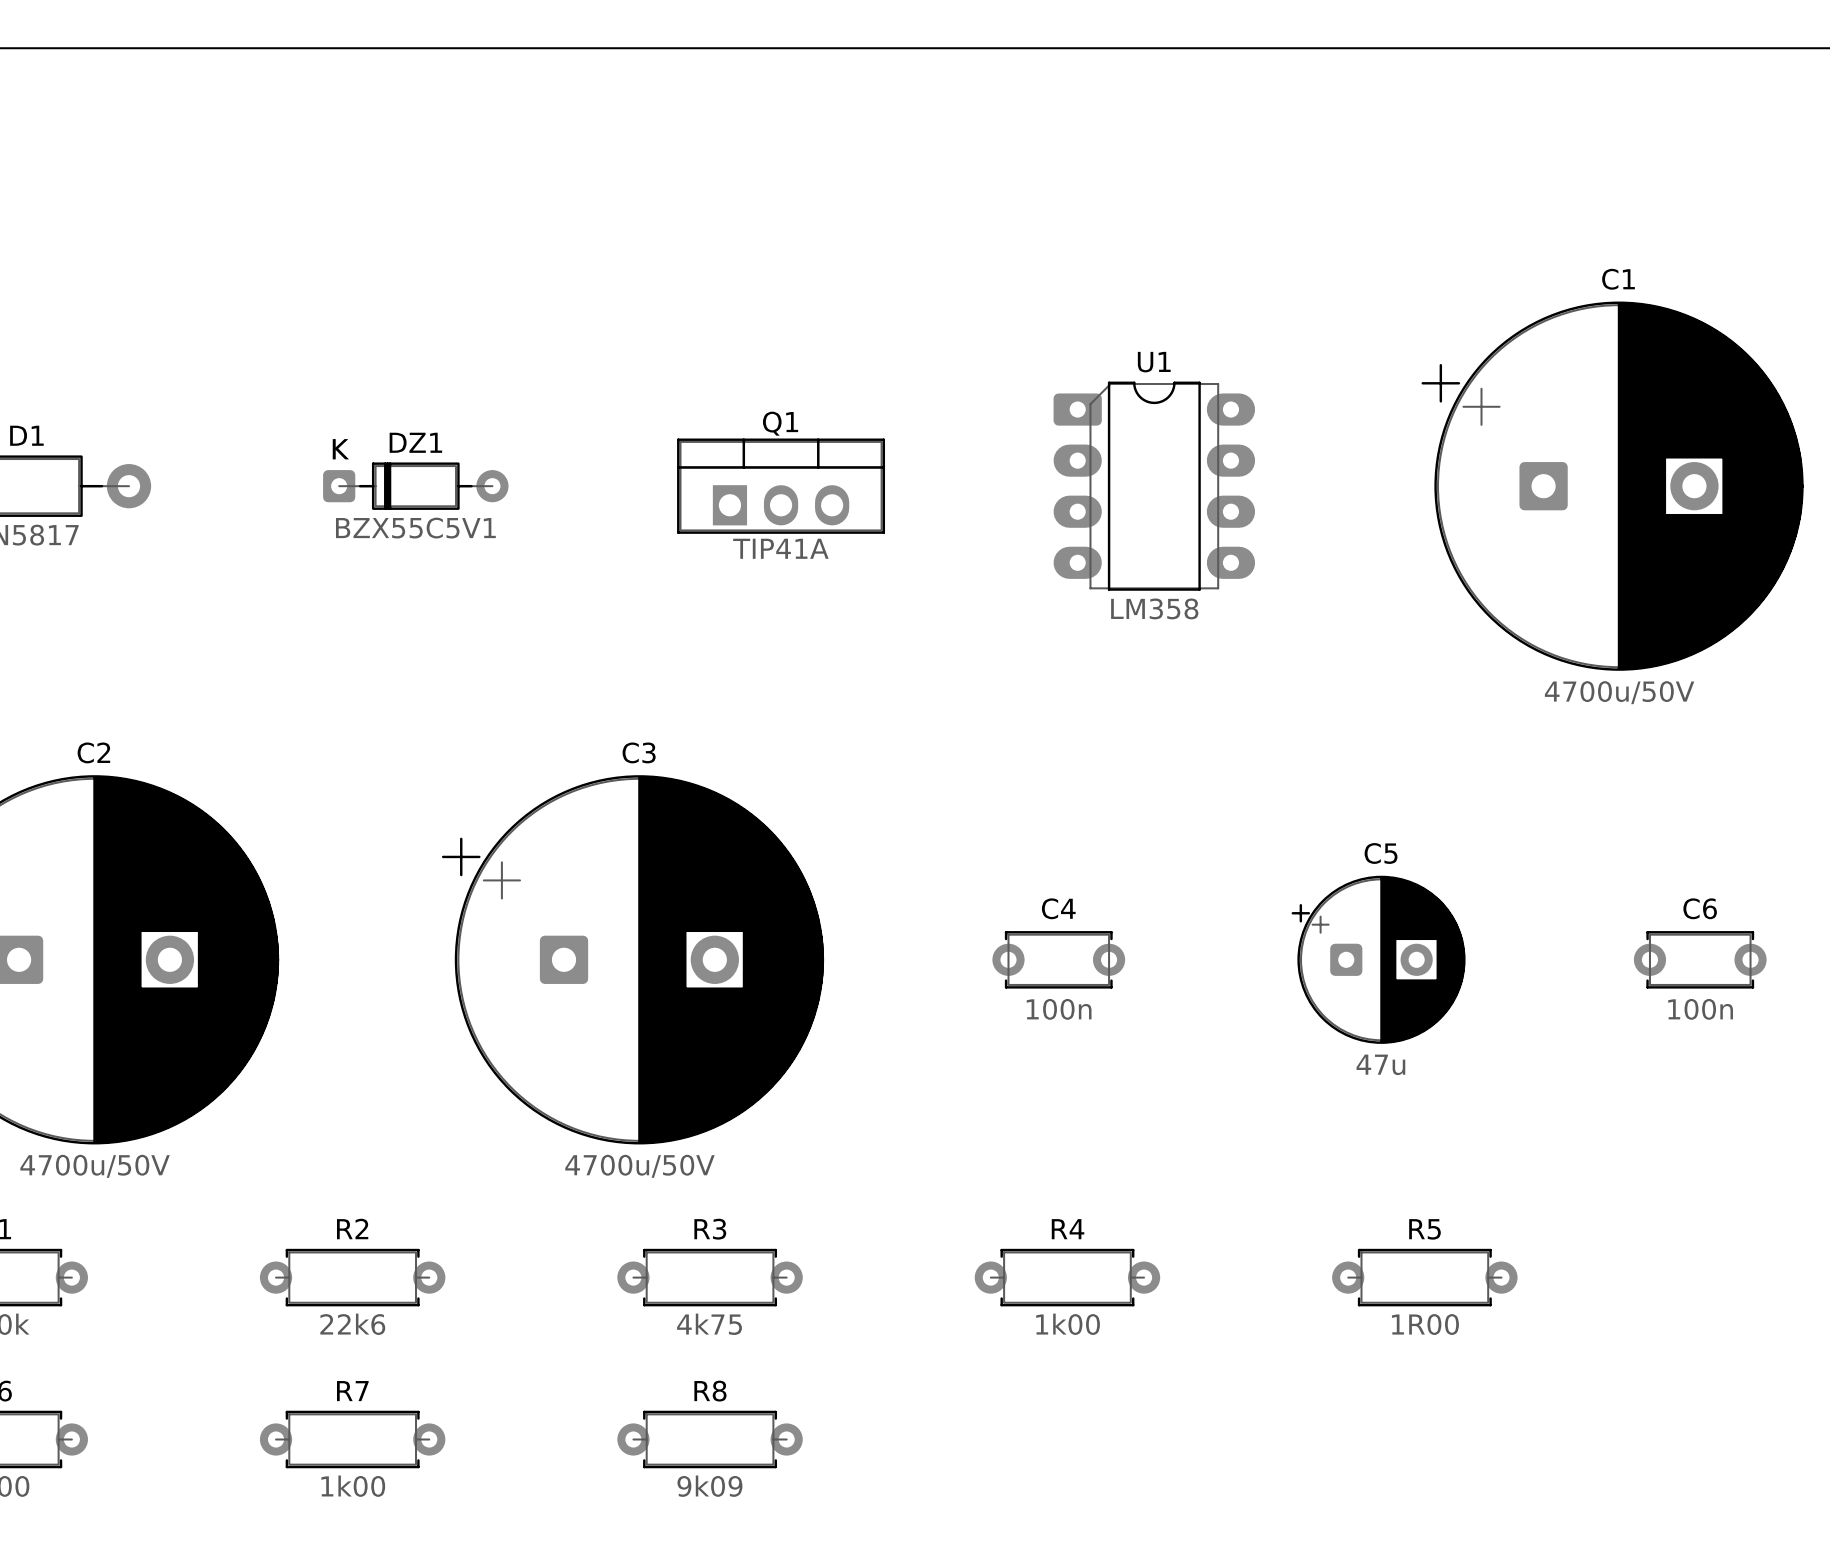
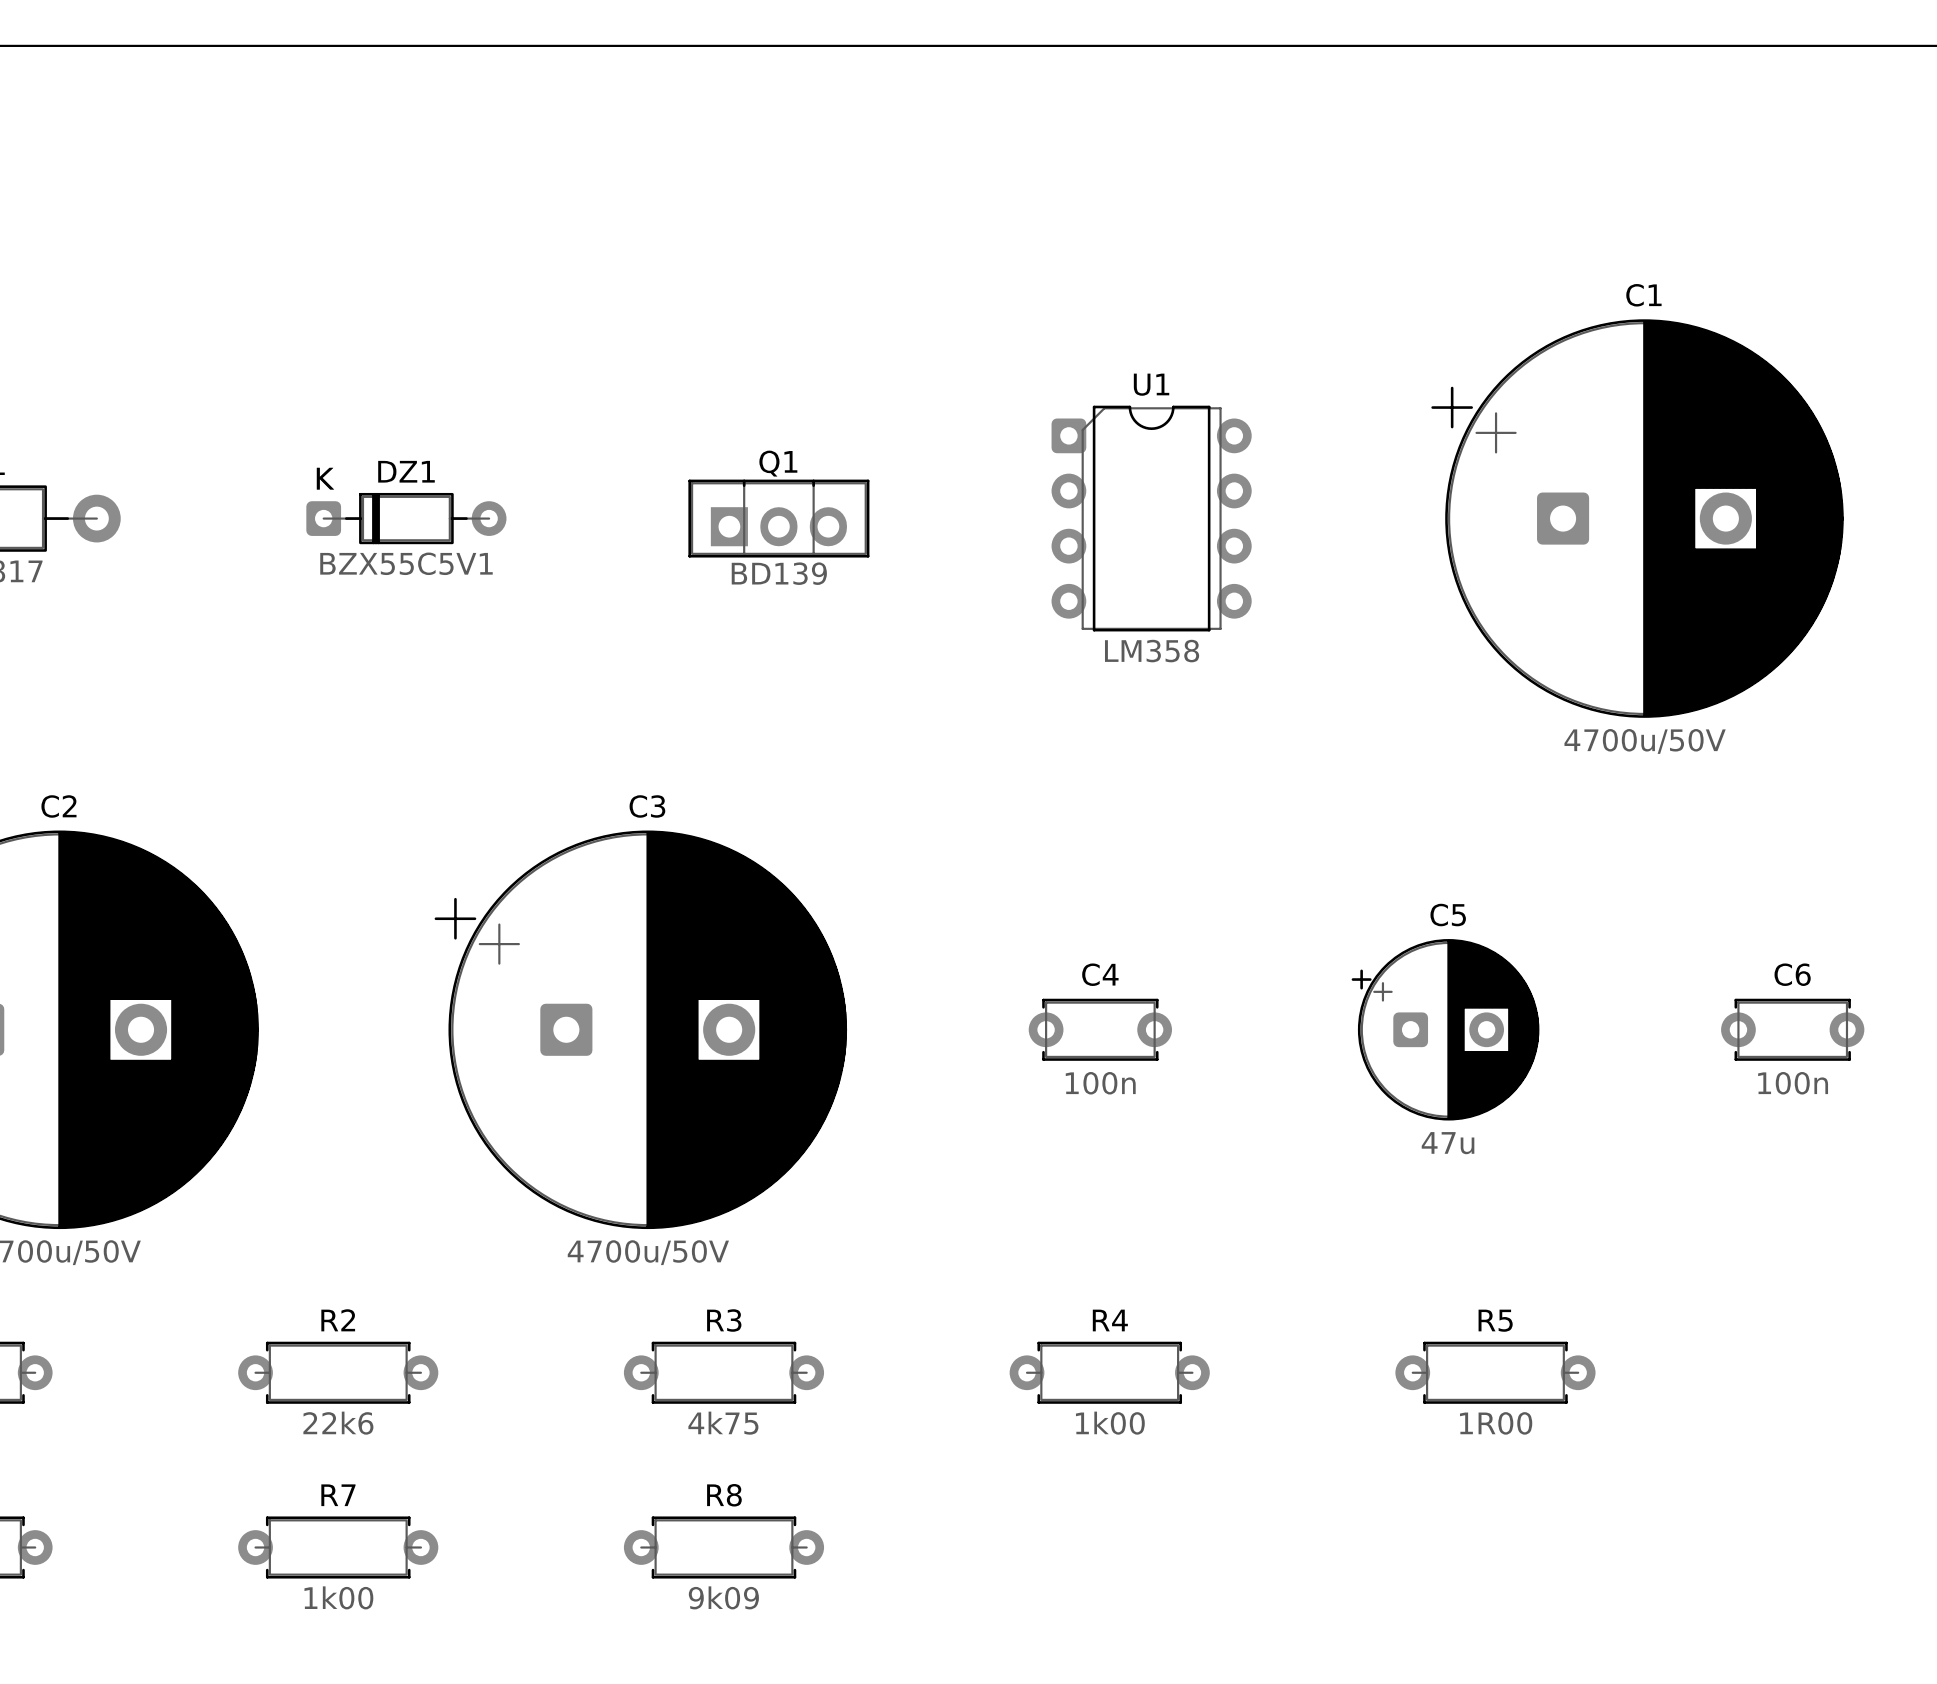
U1 footprint: [1053, 381, 1256, 591] -> [1051, 405, 1252, 632]
Q1 footprint: [677, 438, 886, 534] -> [688, 479, 870, 558]
C1 position: (1612, 486) -> (1637, 518)
Q1 value: TIP41A (780, 548) -> BD139 (779, 573)

